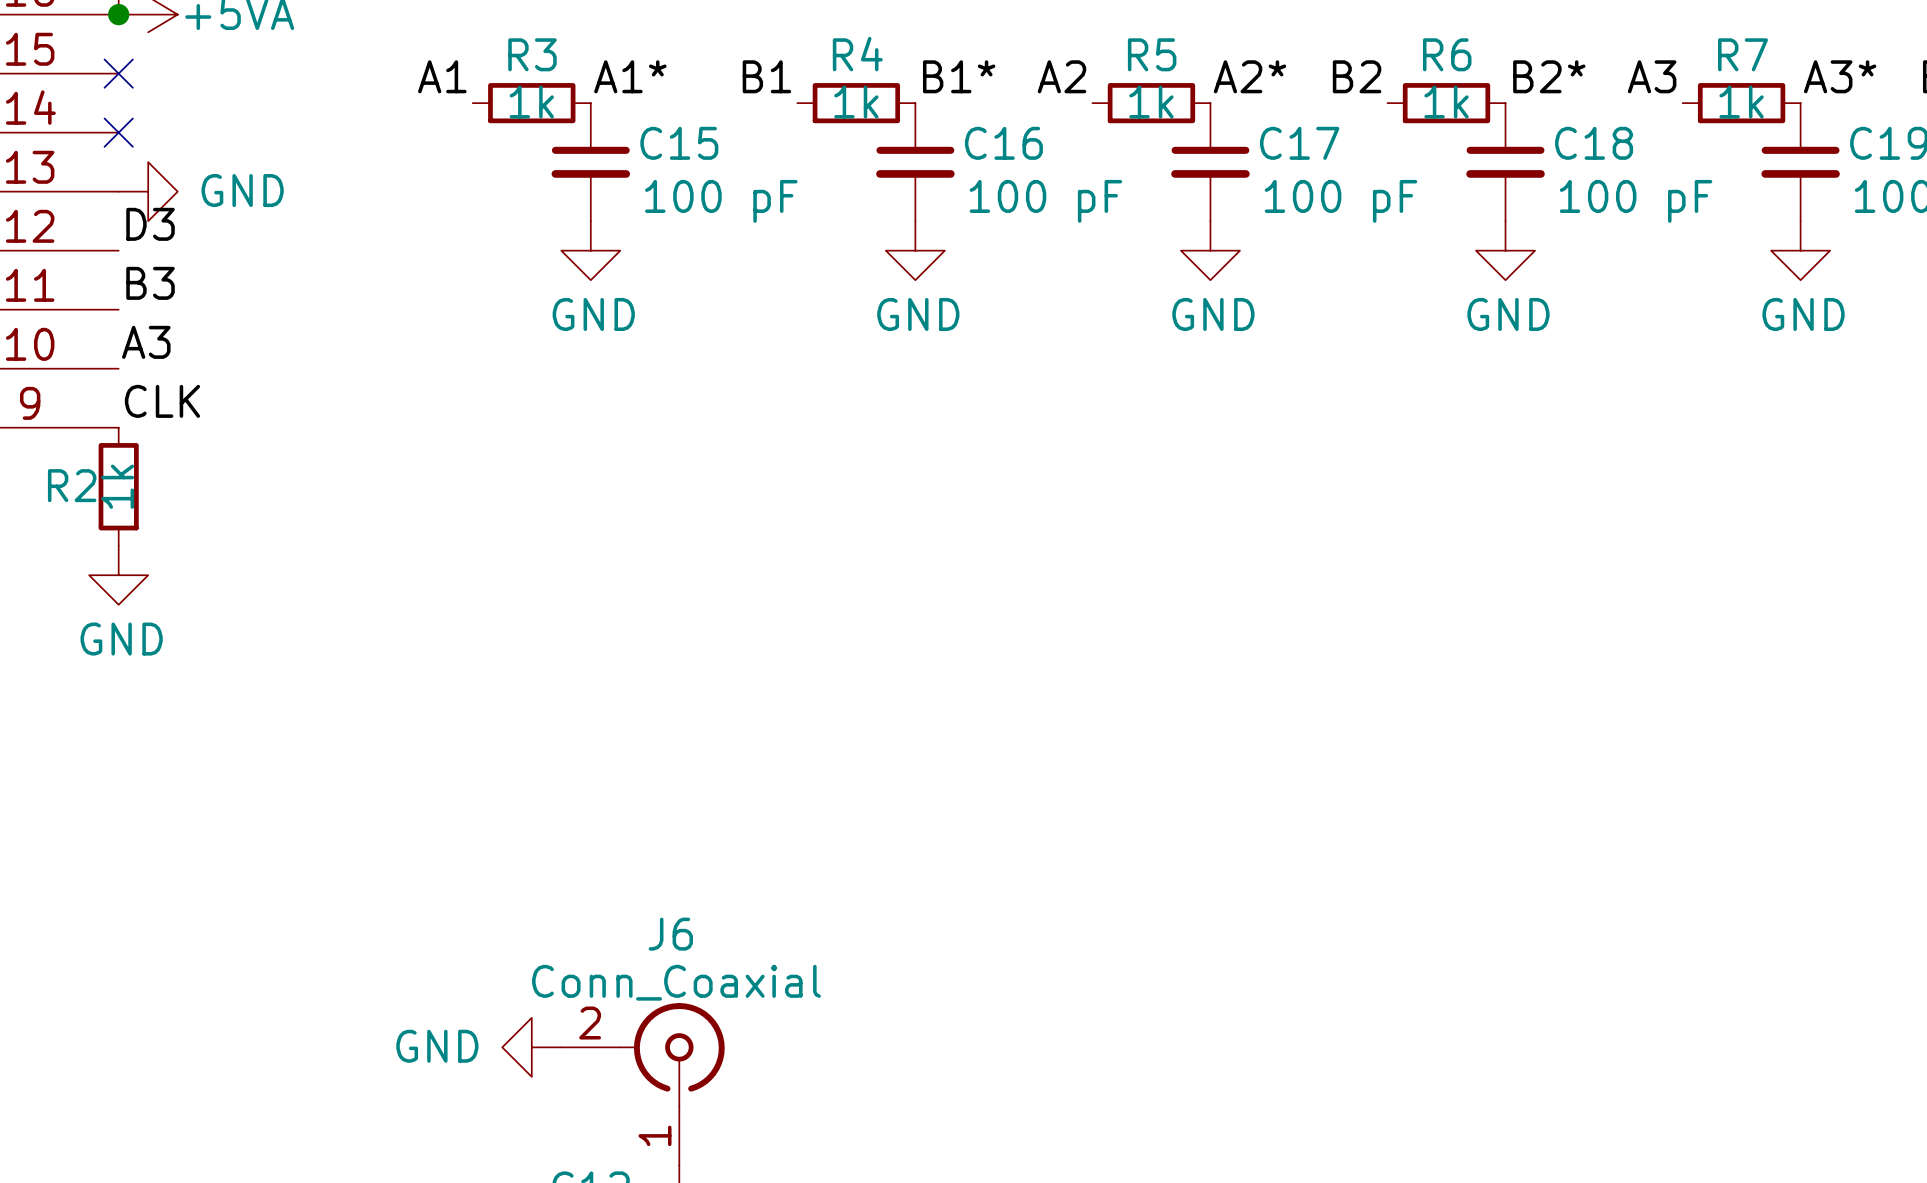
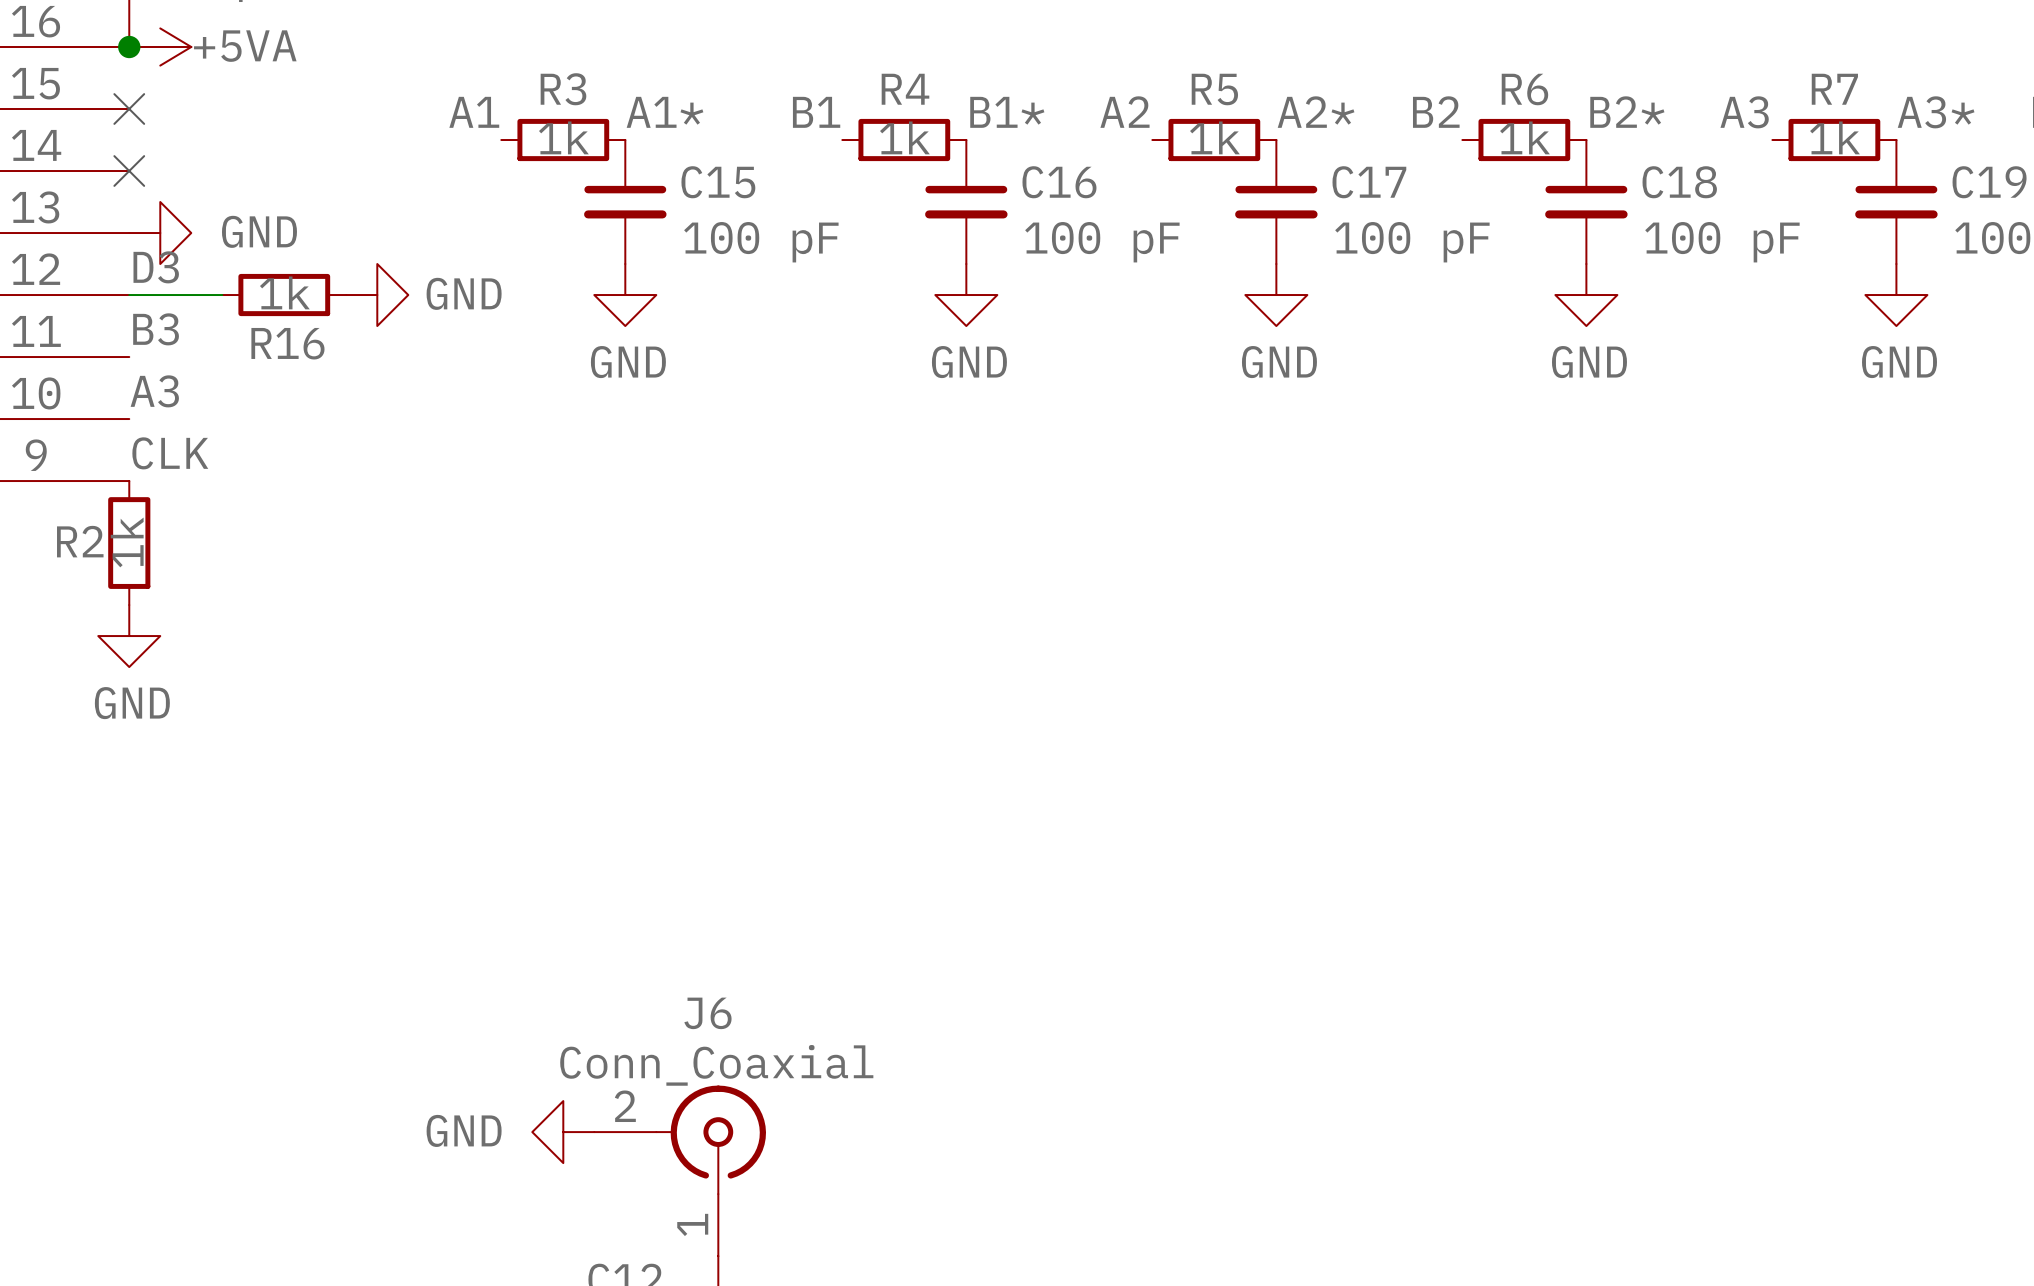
wire: none -> (129, 295) (222, 295)
R16: none -> 1k (284, 295)
power symbol: none -> GND (377, 295)

